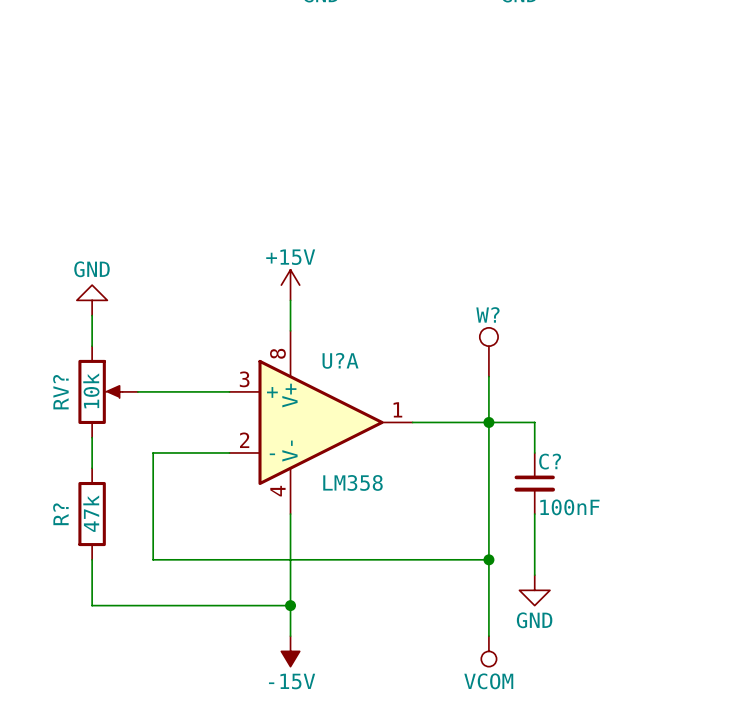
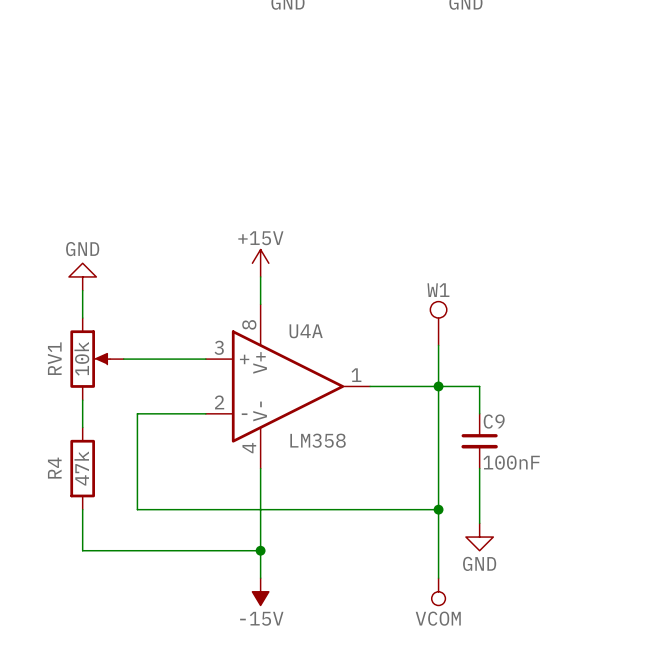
W? name: W? (487, 314) -> W1 (438, 290)
U?A name: U?A (340, 360) -> U4A (306, 331)
RV? name: RV? (60, 392) -> RV1 (54, 358)
C? name: C? (550, 461) -> C9 (494, 421)
R? name: R? (60, 514) -> R4 (54, 468)

